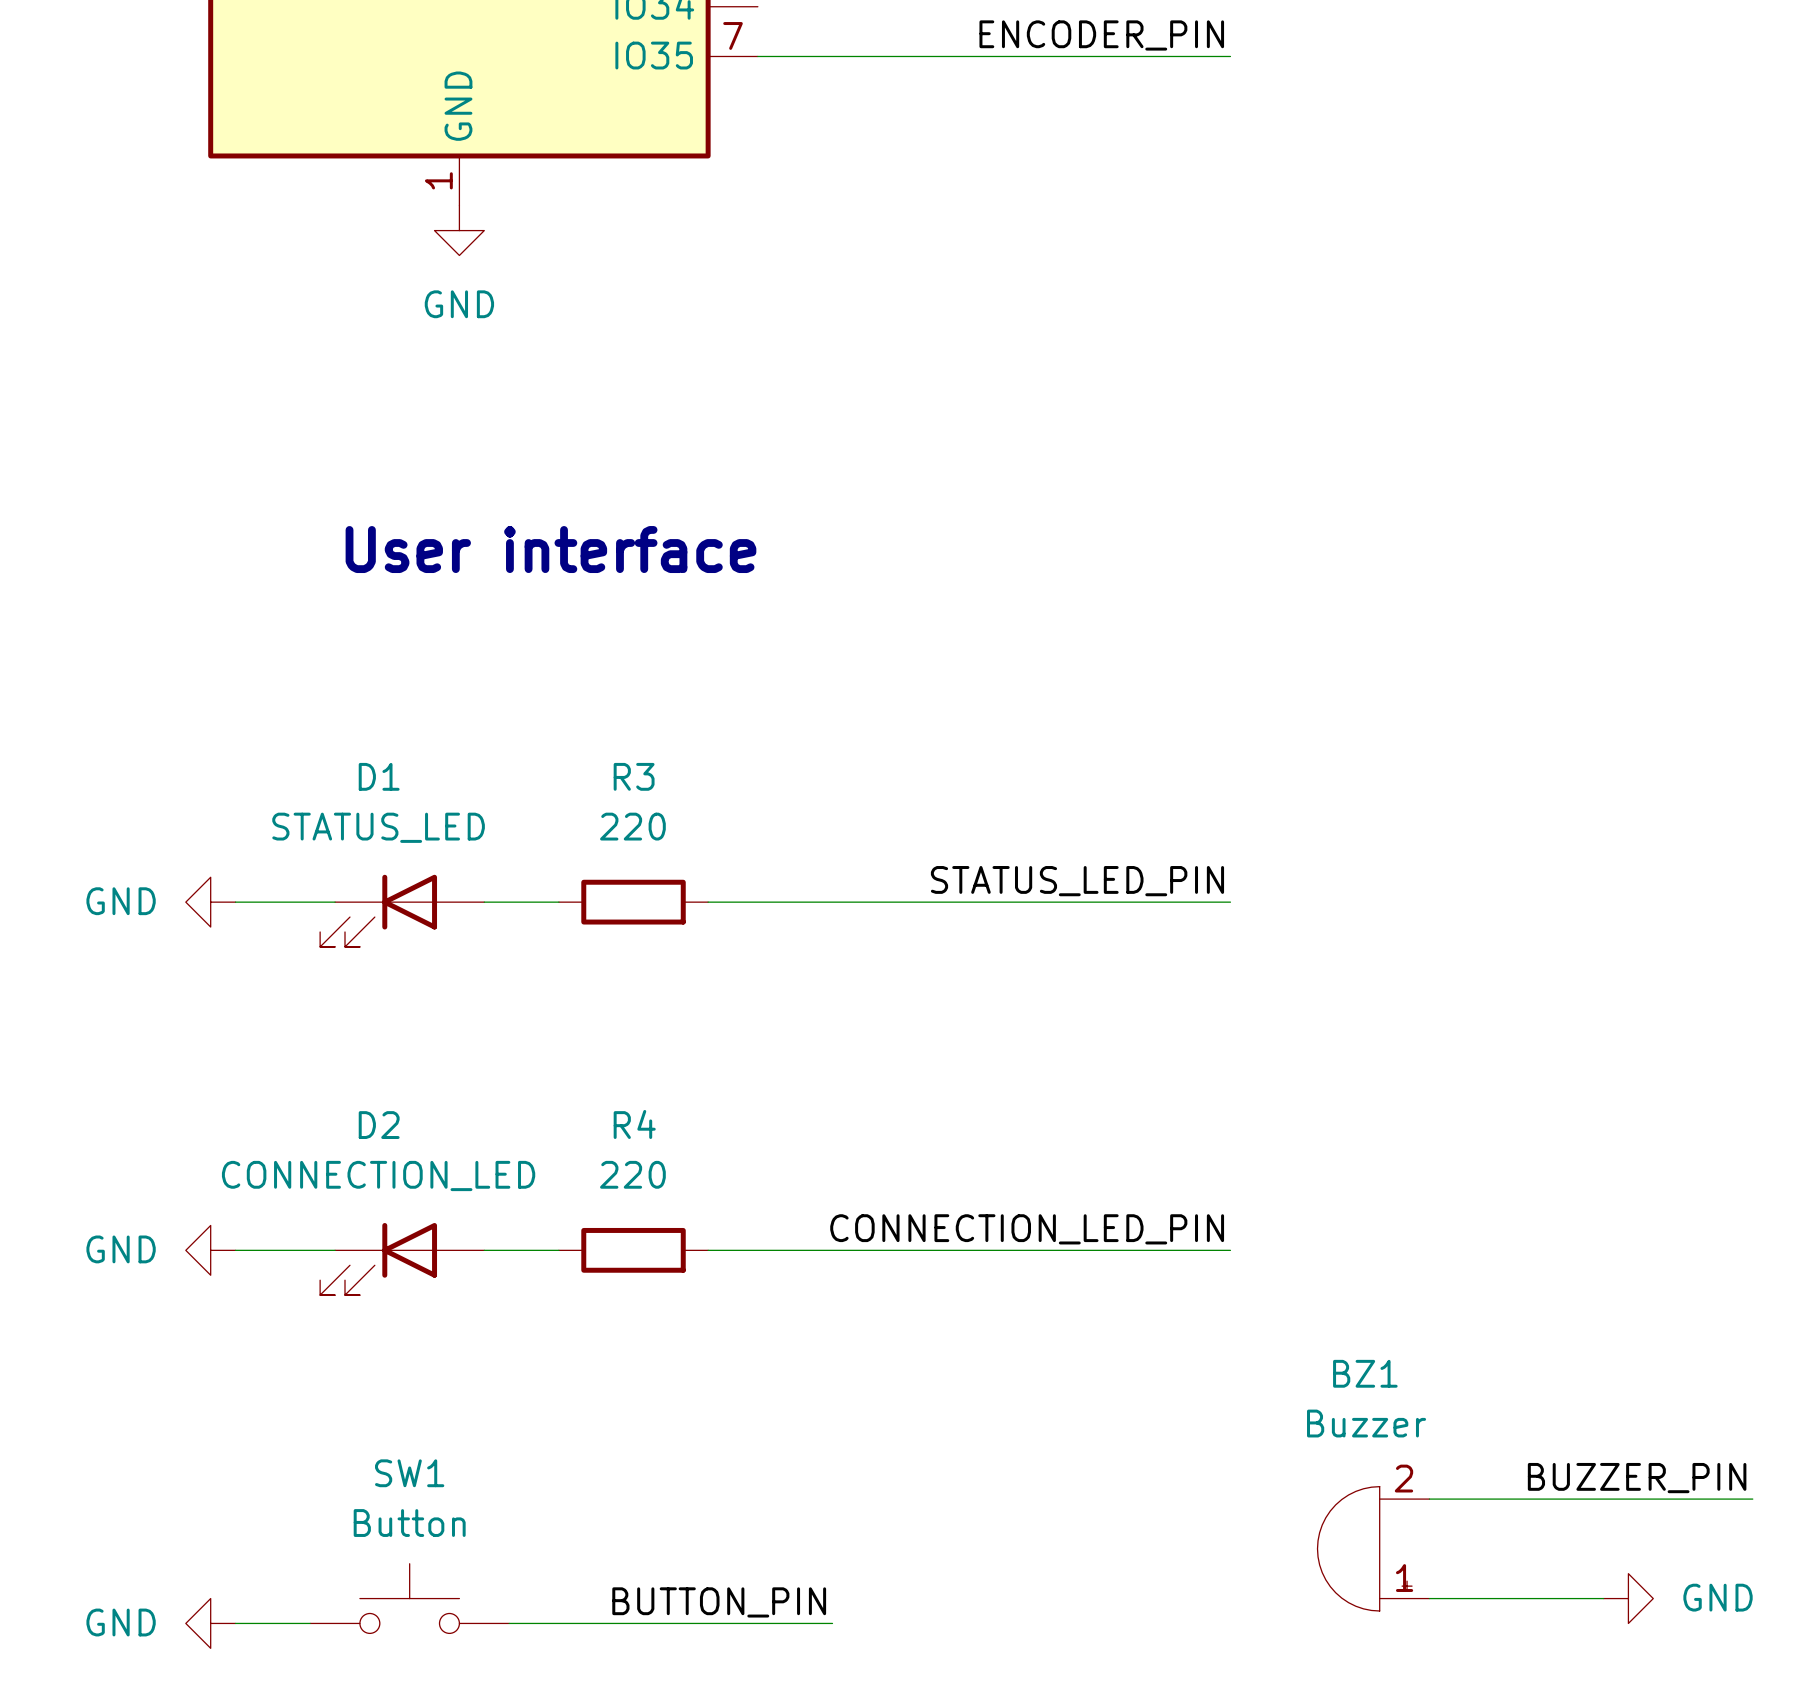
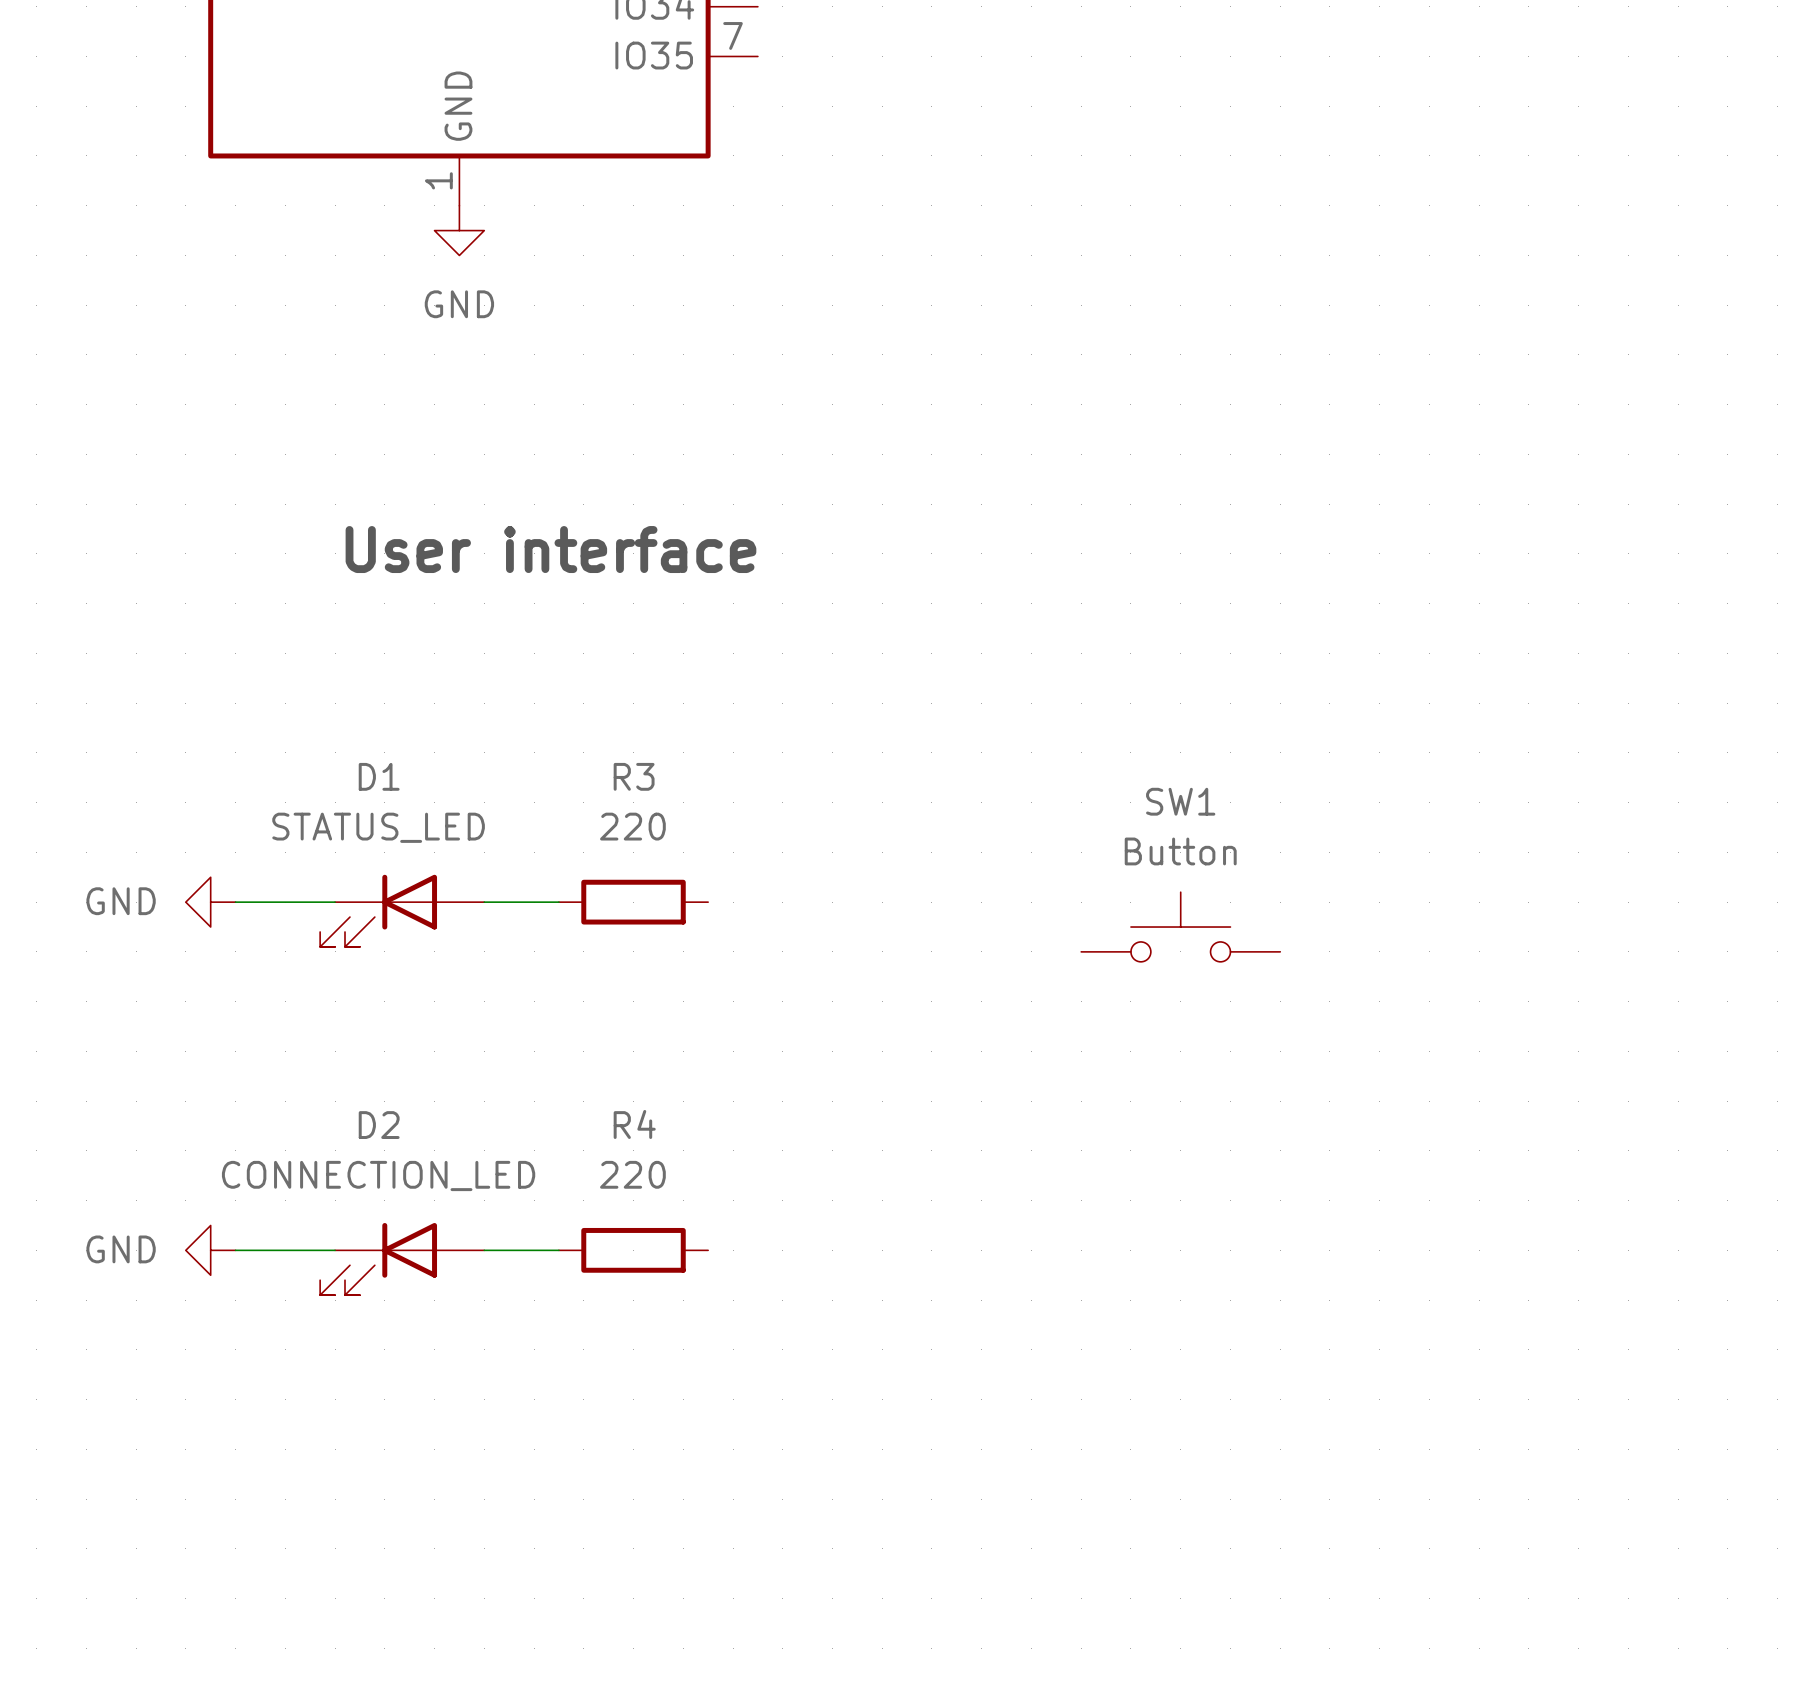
label: ENCODER_PIN (1101, 35) -> none
wire: (757, 56) (1230, 56) -> none
label: STATUS_LED_PIN (1077, 881) -> none
wire: (708, 902) (1230, 902) -> none
label: CONNECTION_LED_PIN (1027, 1229) -> none
wire: (708, 1250) (1230, 1250) -> none
label: BUZZER_PIN (1637, 1478) -> none
wire: (1429, 1499) (1752, 1499) -> none
BZ1: Buzzer (1373, 1548) -> none
SW1 position: (409, 1598) -> (1180, 927)
wire: (1429, 1598) (1603, 1598) -> none
power symbol: GND (1628, 1598) -> none
label: BUTTON_PIN (719, 1602) -> none
power symbol: GND (210, 1623) -> none
wire: (235, 1623) (310, 1623) -> none
wire: (509, 1623) (832, 1623) -> none

